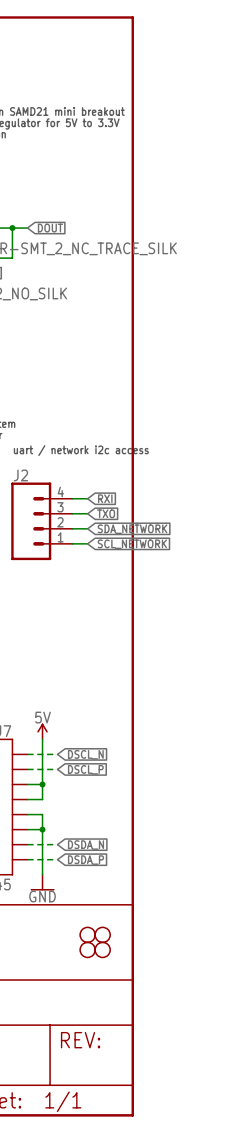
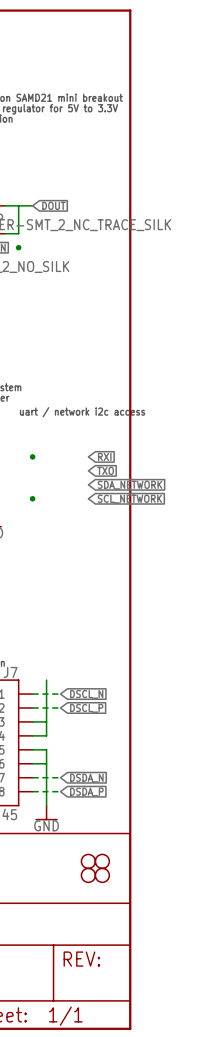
junction: (12, 228) -> none
junction: none -> (18, 247)
junction: none -> (32, 456)
wire: (72, 498) (87, 498) -> none
wire: (72, 513) (87, 513) -> none
J2: (41, 521) -> none
wire: (72, 528) (87, 528) -> none
junction: none -> (32, 498)
wire: (72, 543) (87, 543) -> none
power symbol: 5V (42, 731) -> none
junction: (42, 784) -> none
junction: (42, 829) -> none

